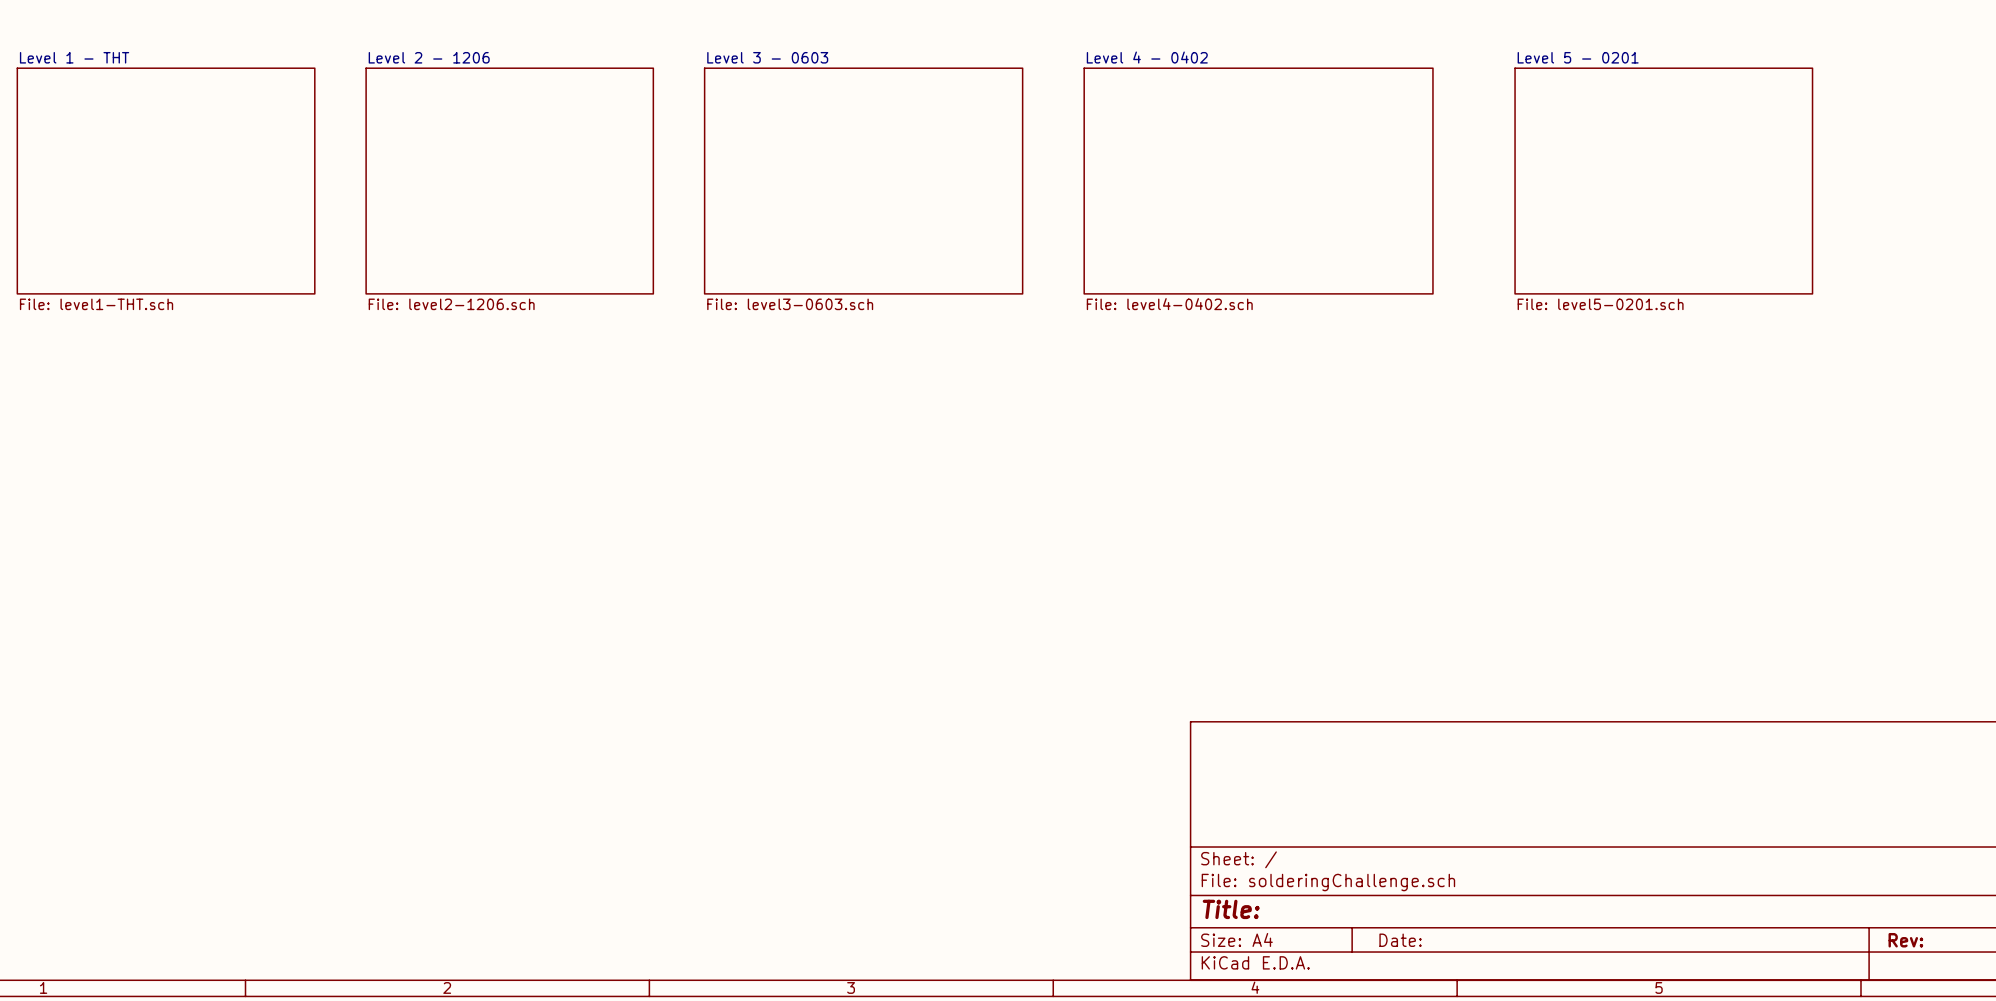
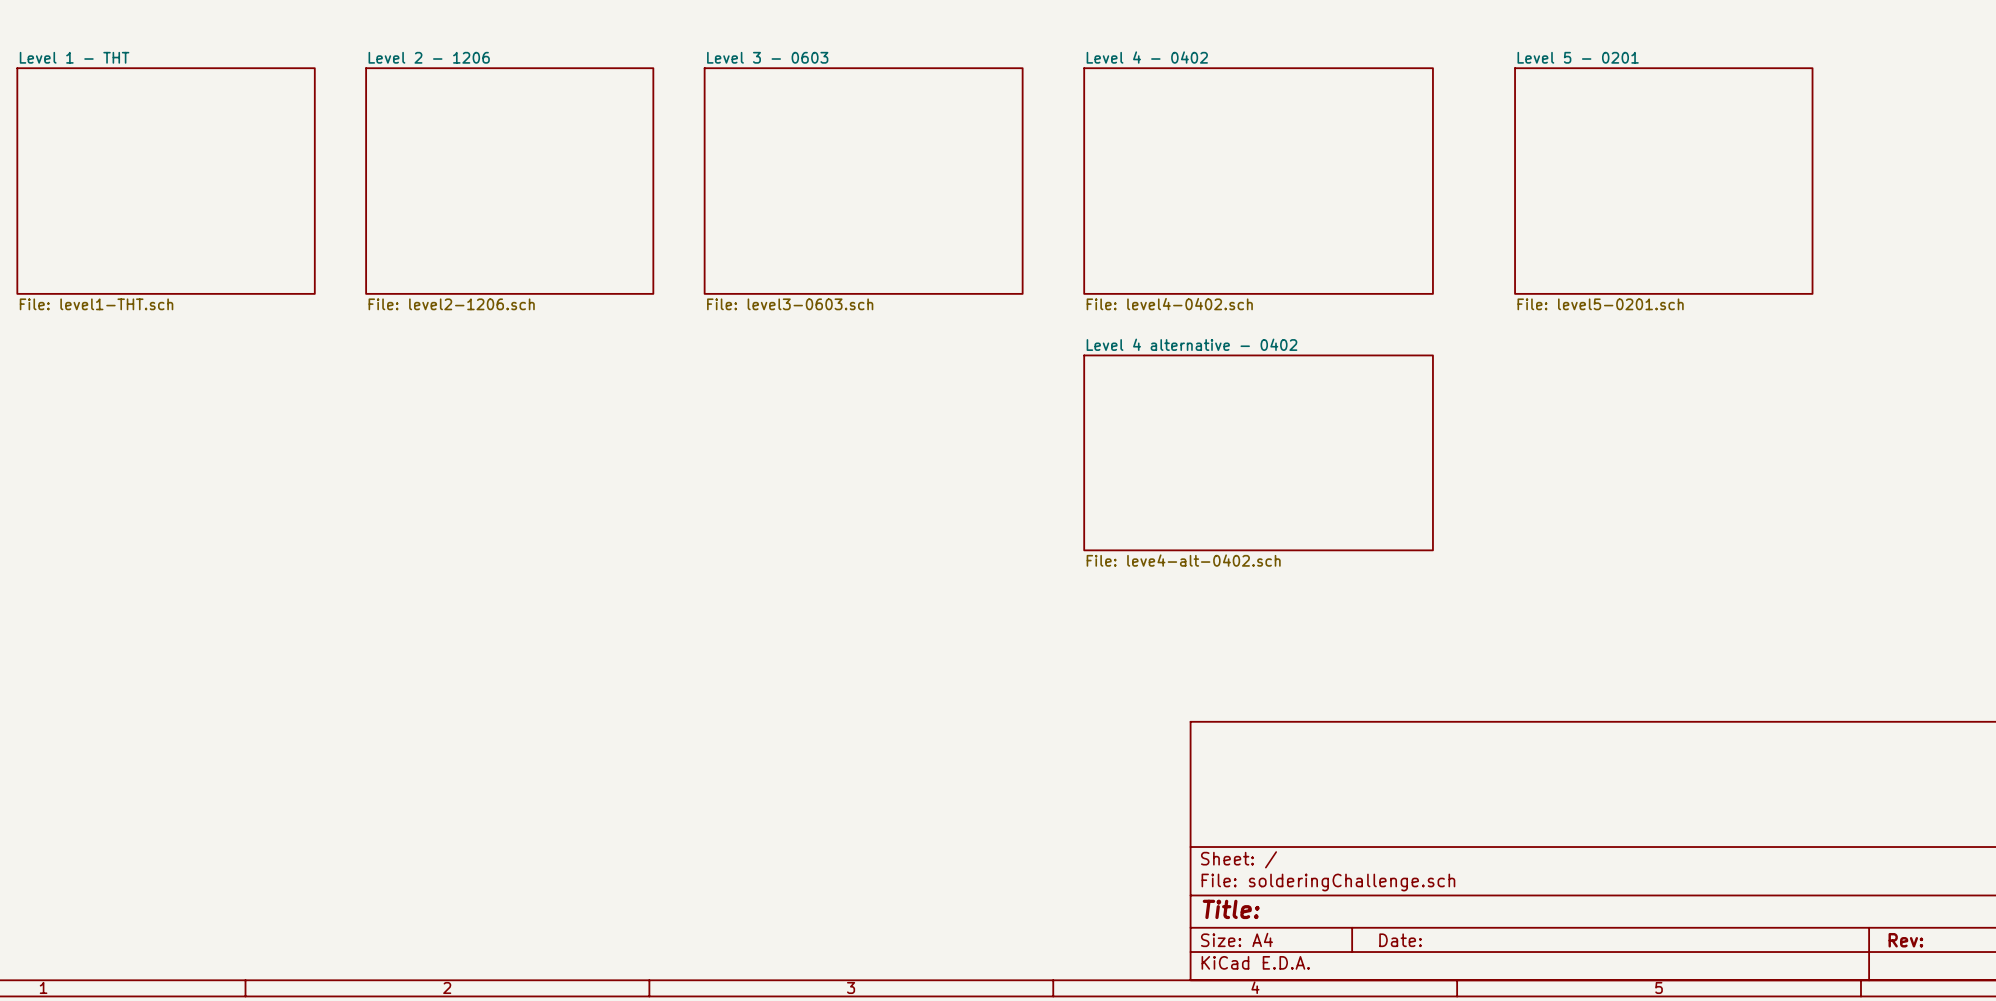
sheet Level 4 alternative - 0402: none -> File: leve4-alt-0402.sch (1258, 452)

